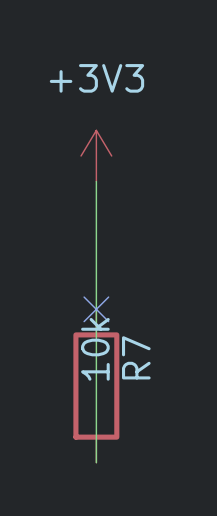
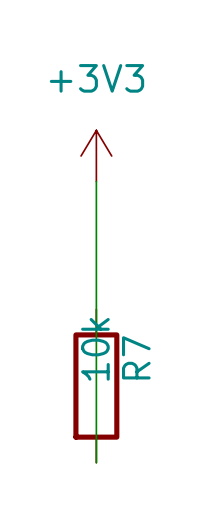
no-connect mark: (96, 309) -> none

